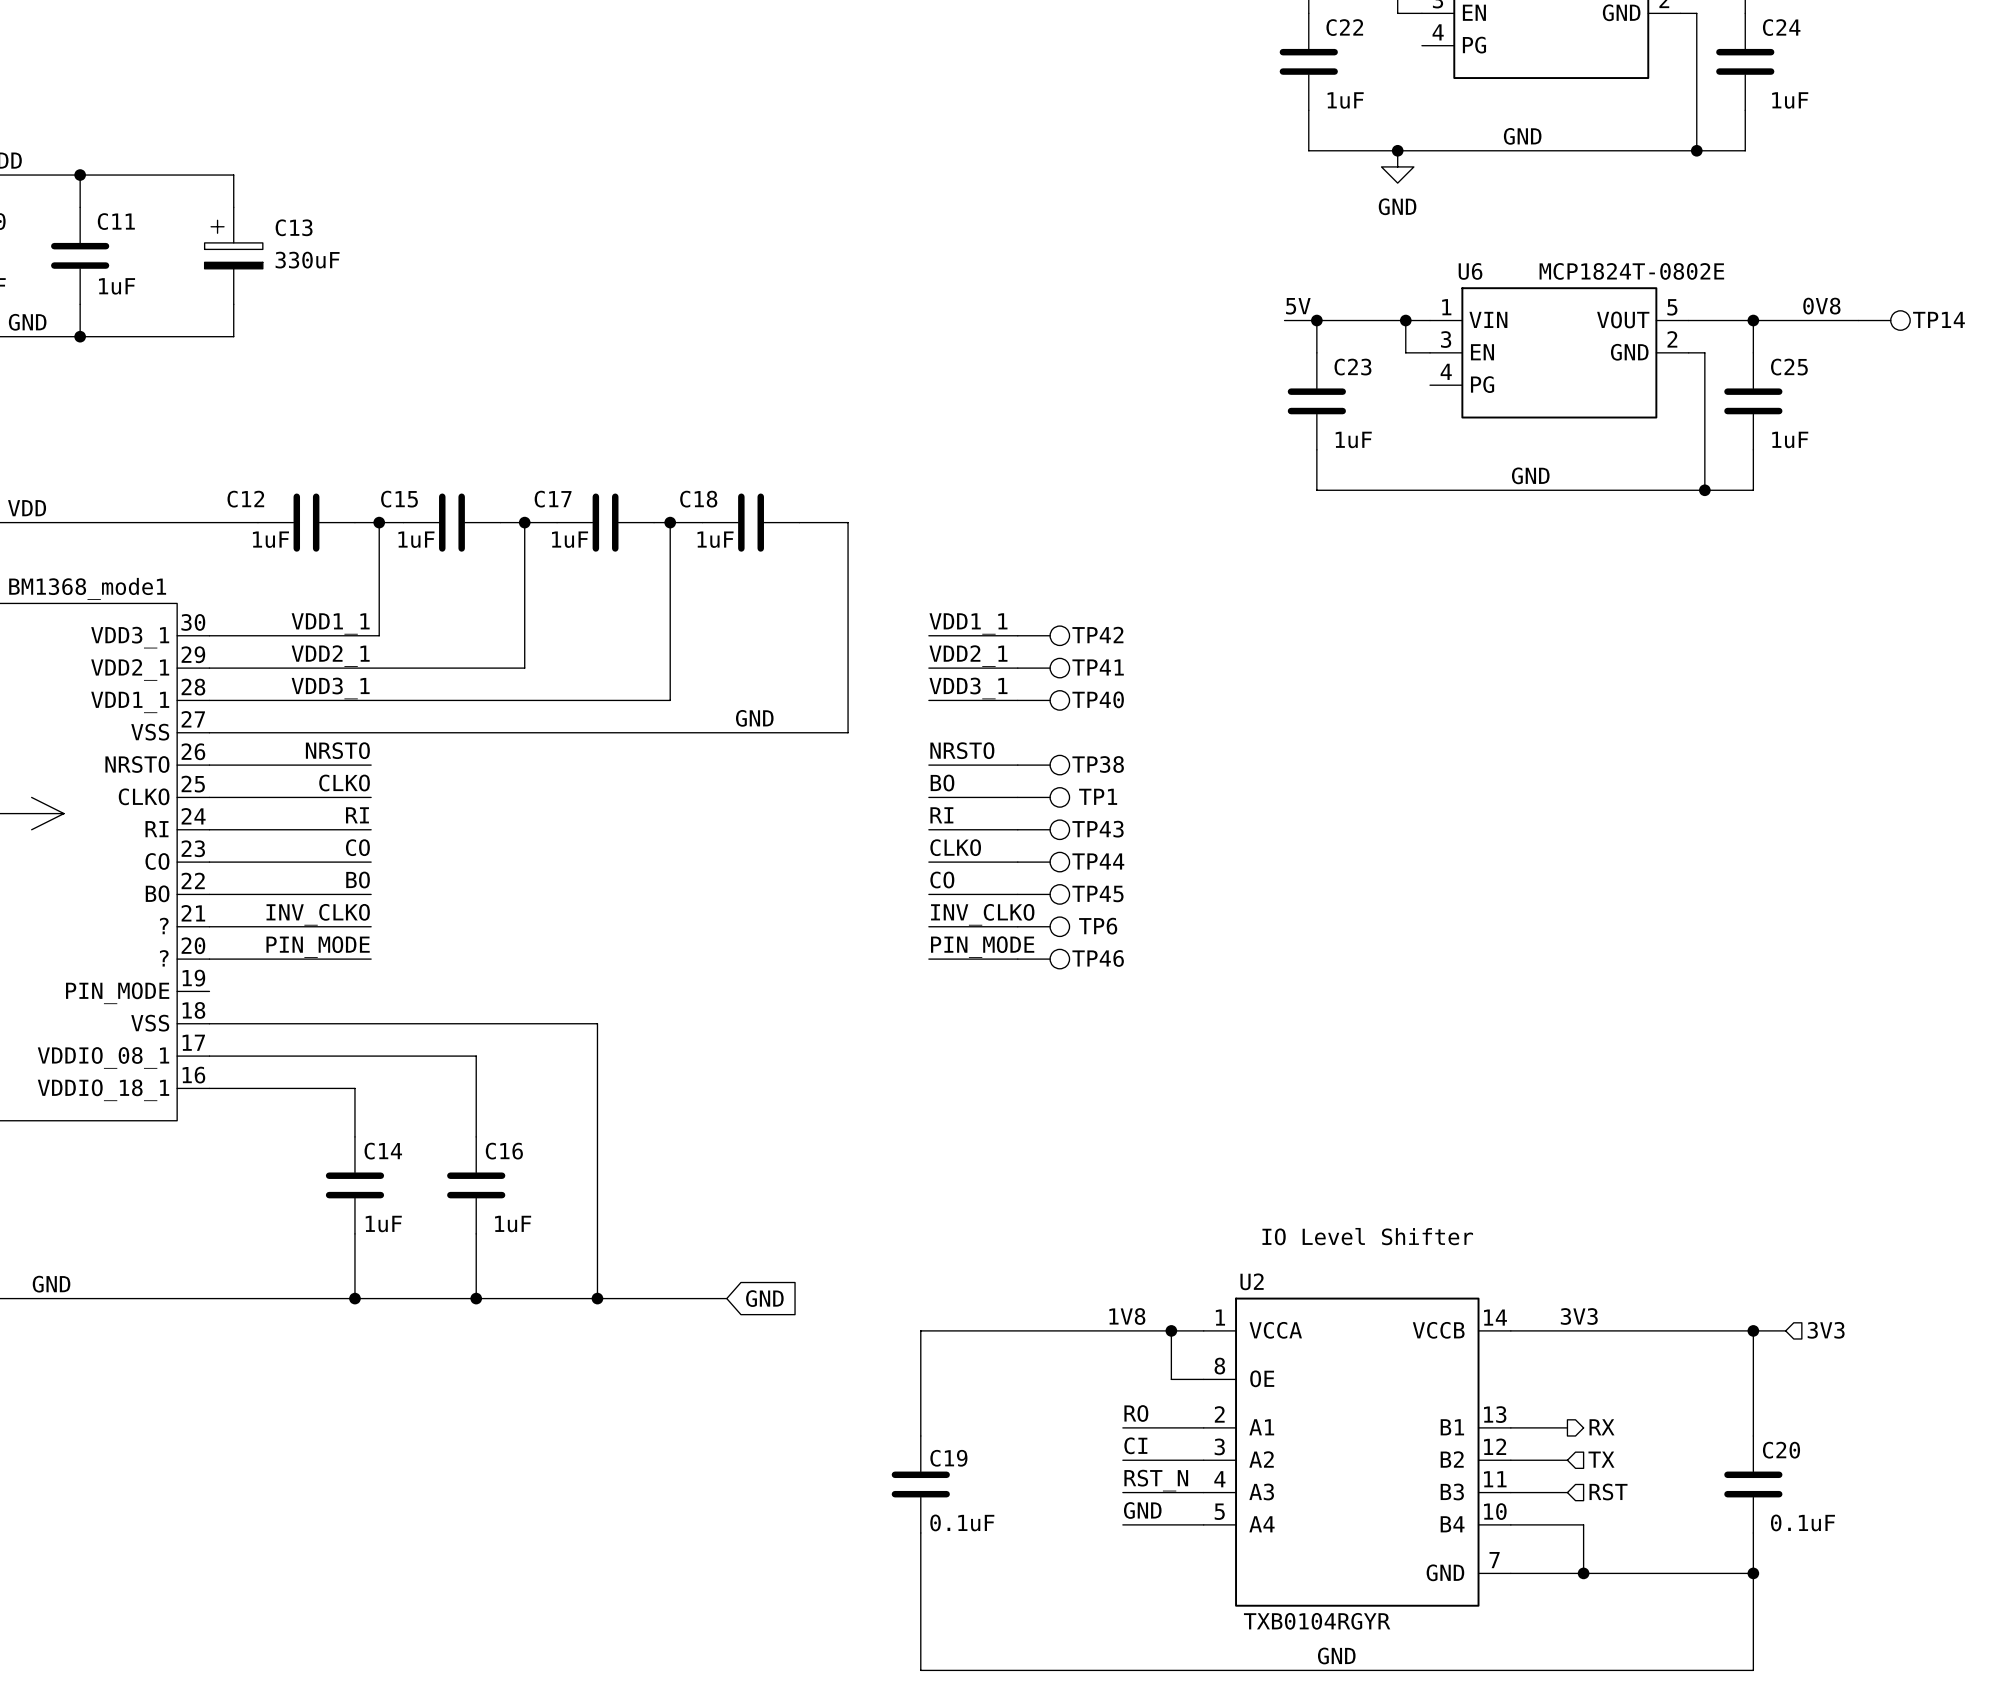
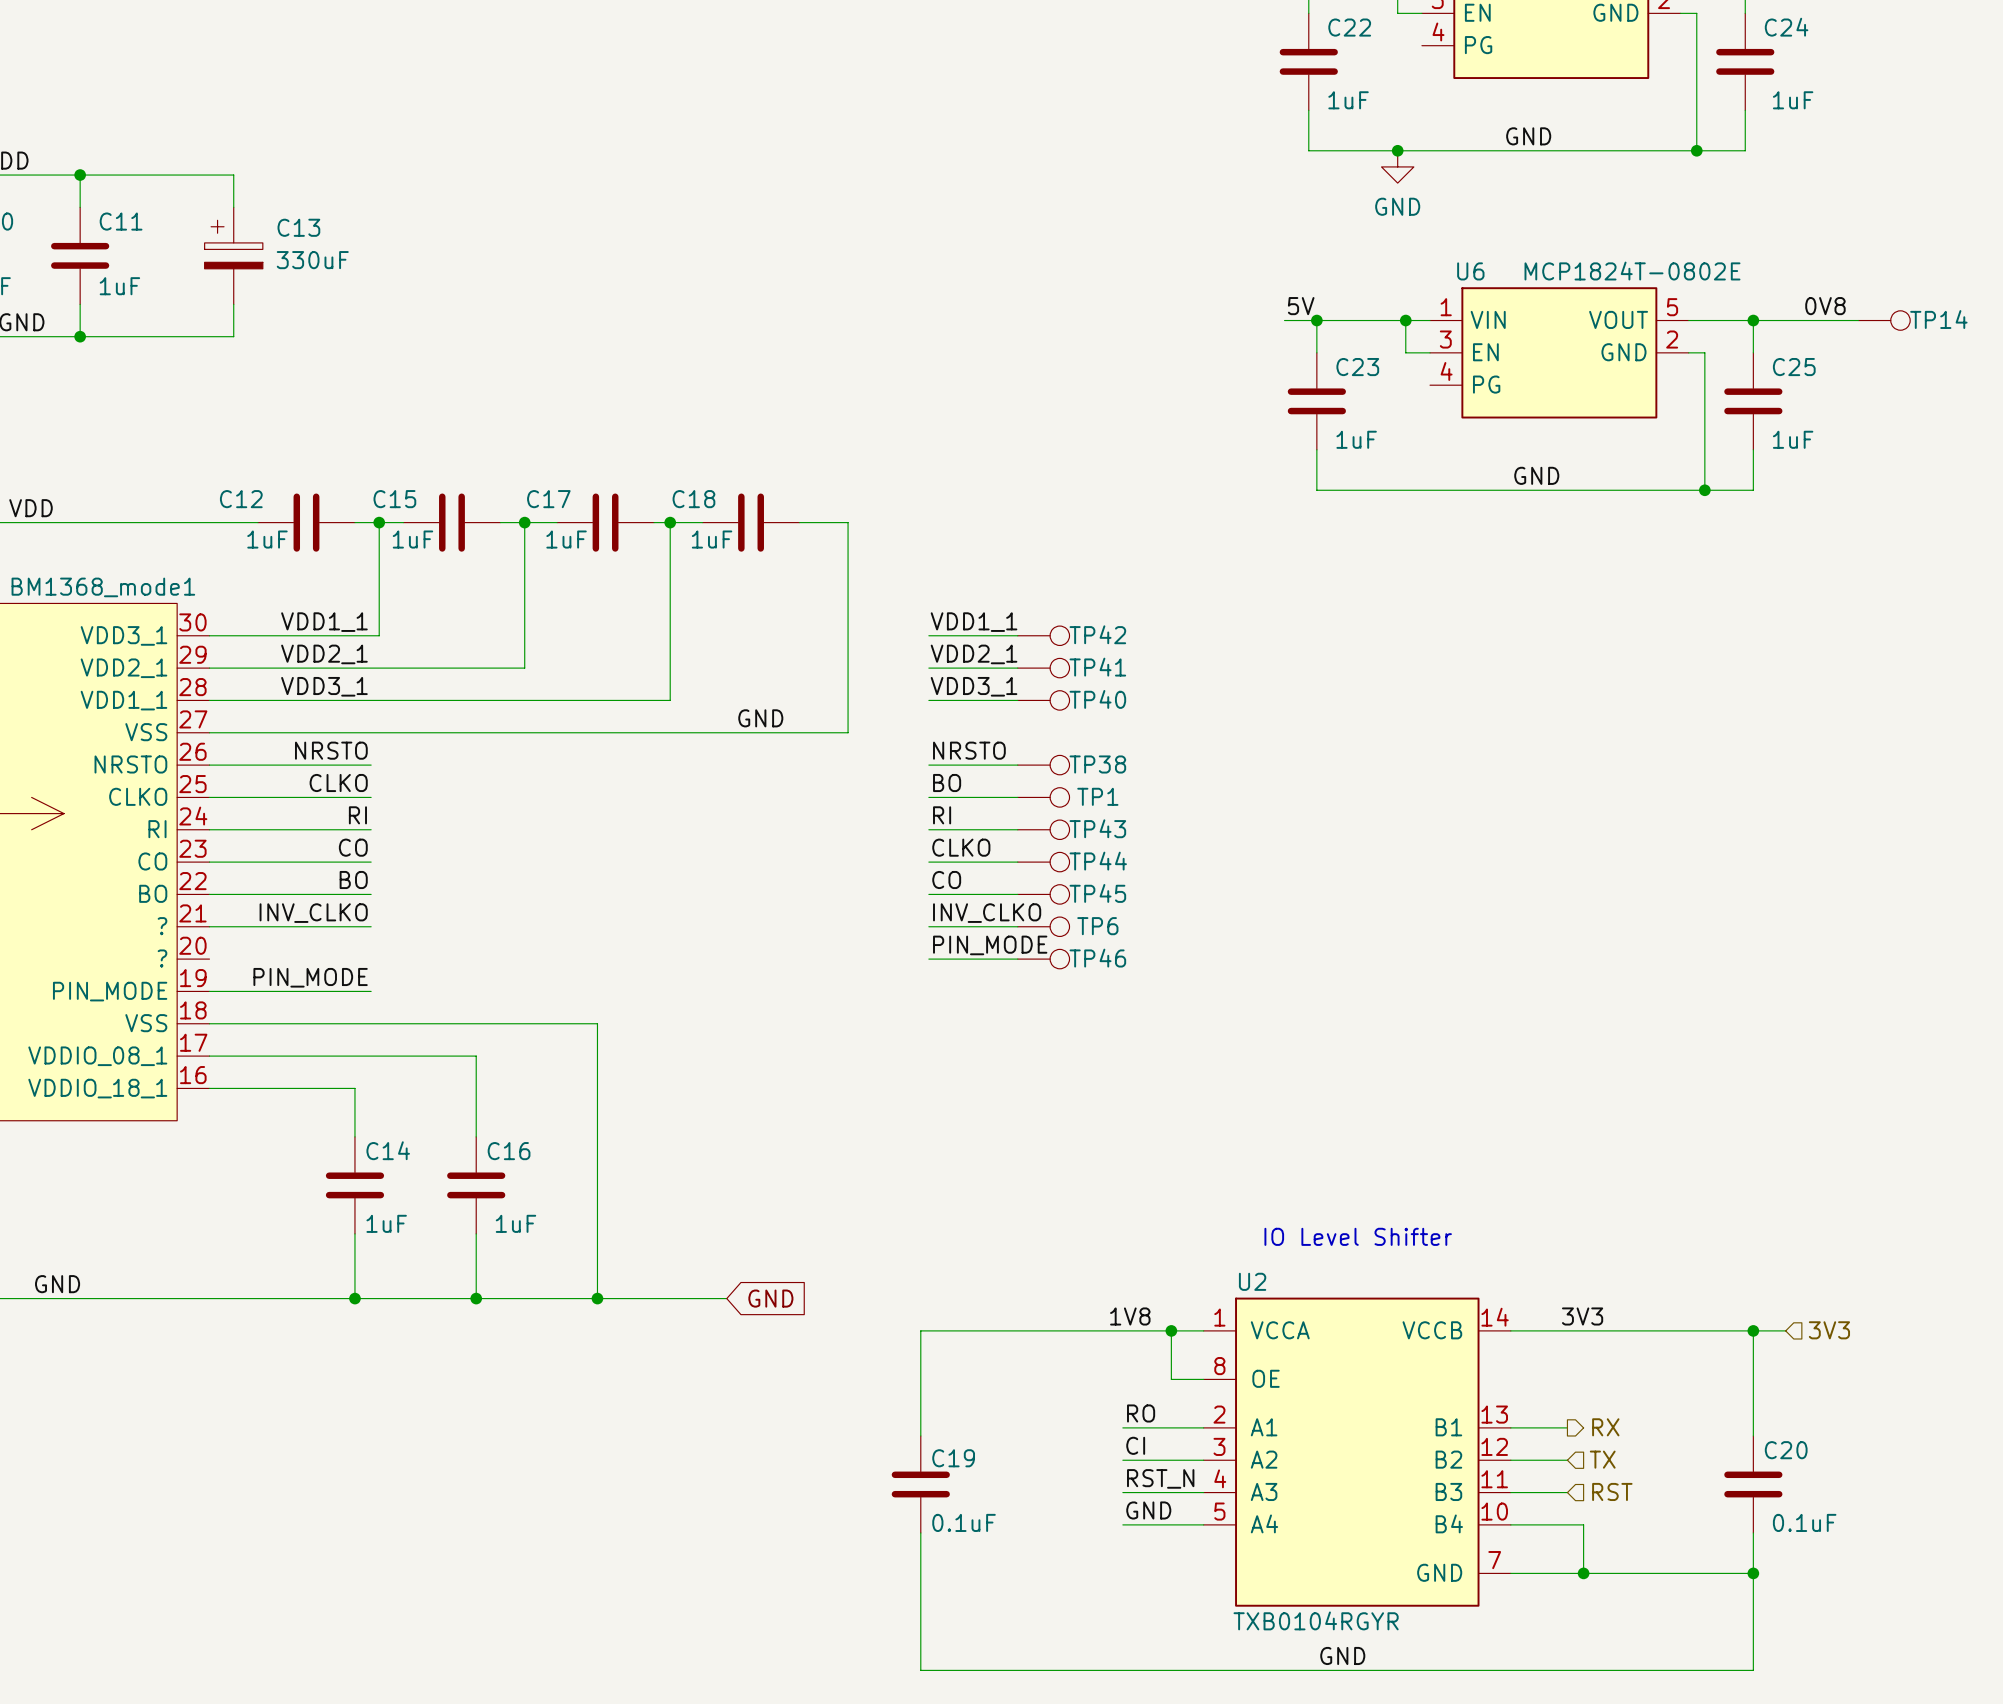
label position: PIN_MODE (318, 947) -> PIN_MODE (310, 977)
wire: (209, 959) (371, 959) -> (209, 991) (371, 991)

